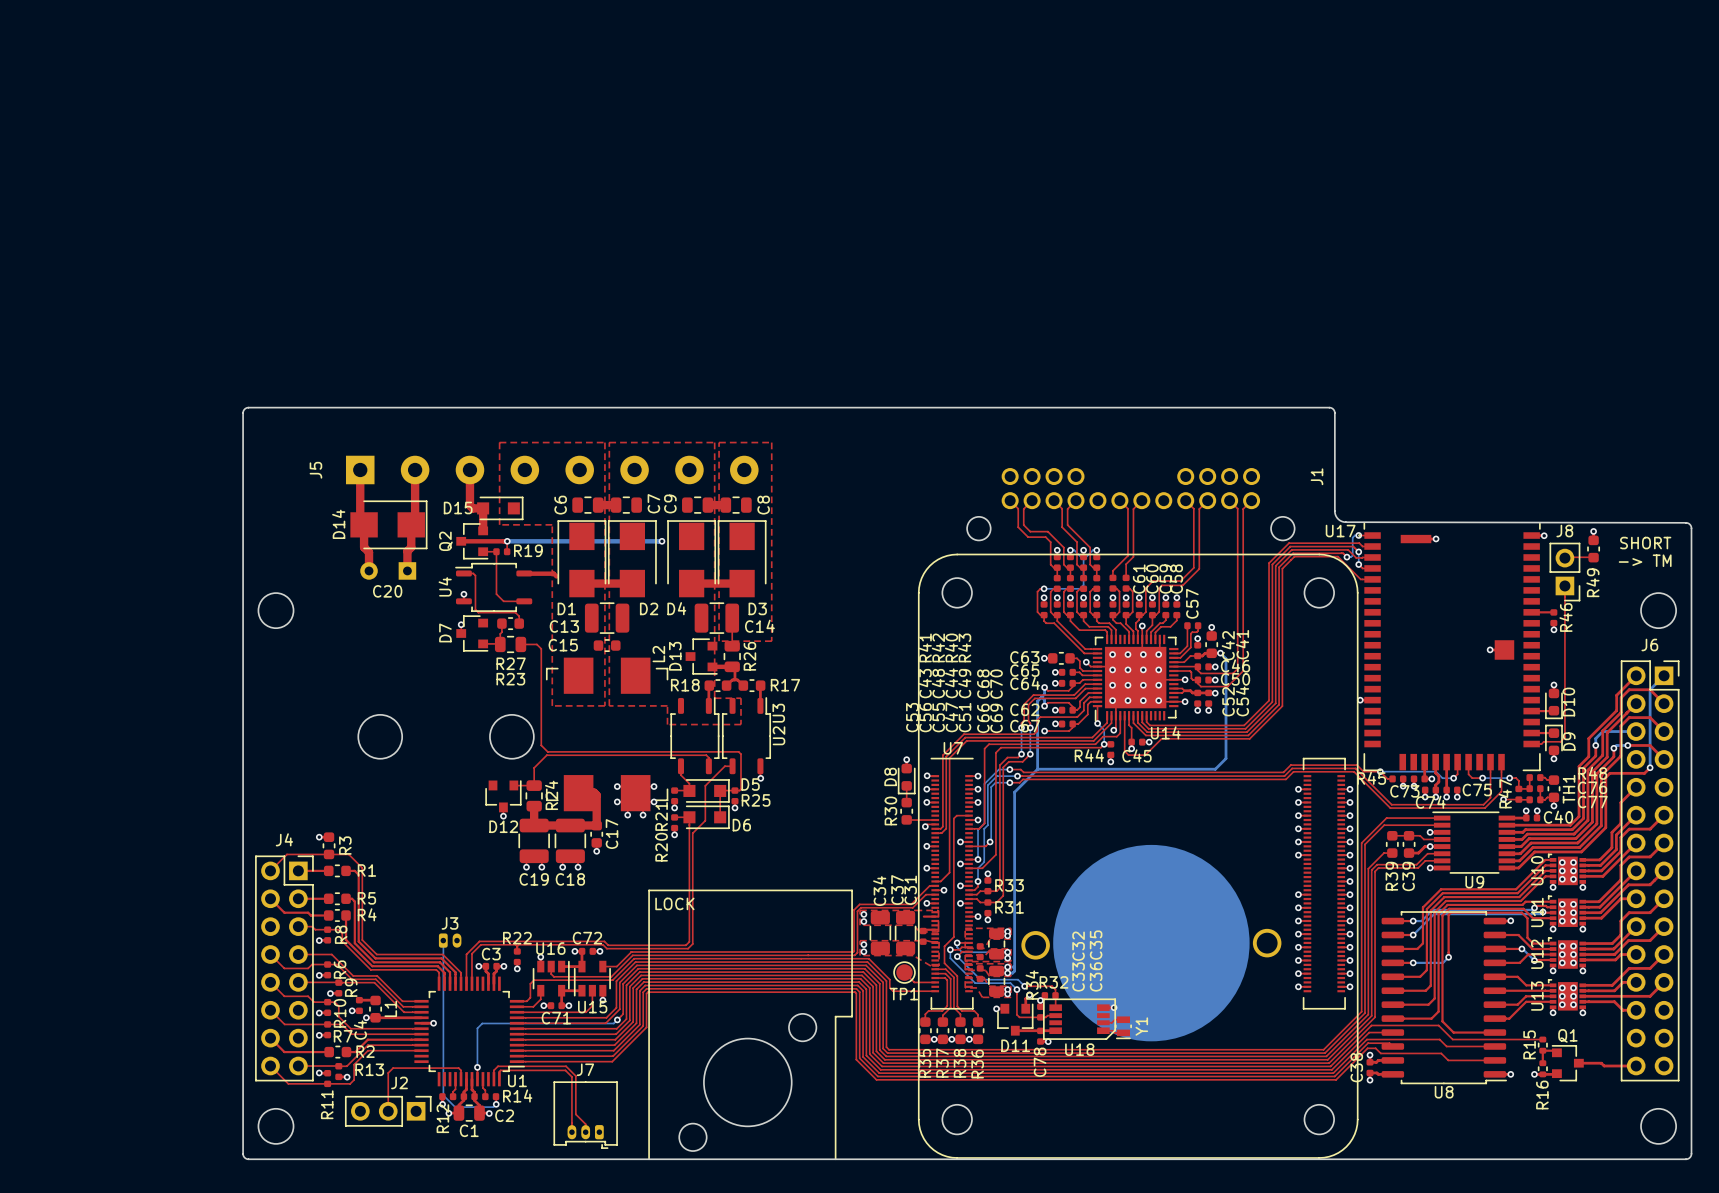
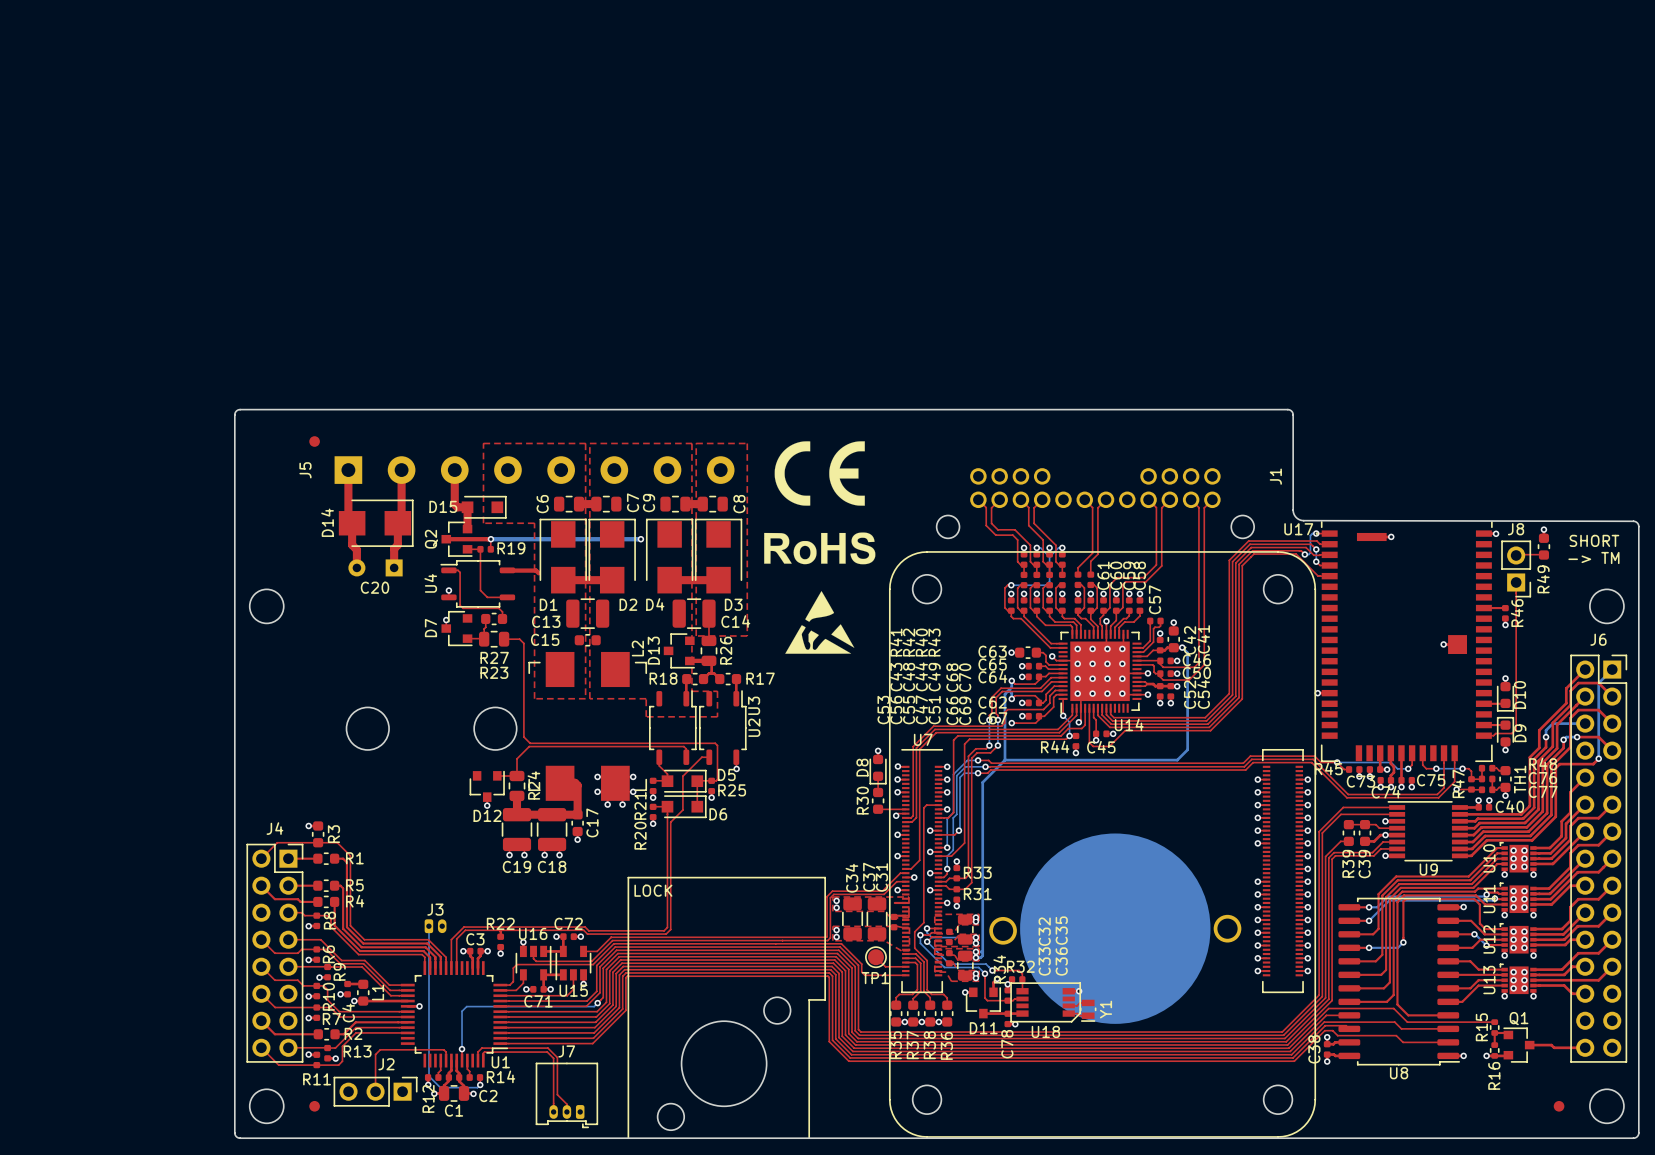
part: none -> (314, 441)
drawing: none -> [774, 441, 865, 506]
drawing: none -> [764, 532, 876, 565]
drawing: none -> [785, 591, 855, 654]
R11 name rotation: 0° (327, 1104) -> 90° clockwise (317, 1079)
part: none -> (314, 1106)
part: none -> (1559, 1106)

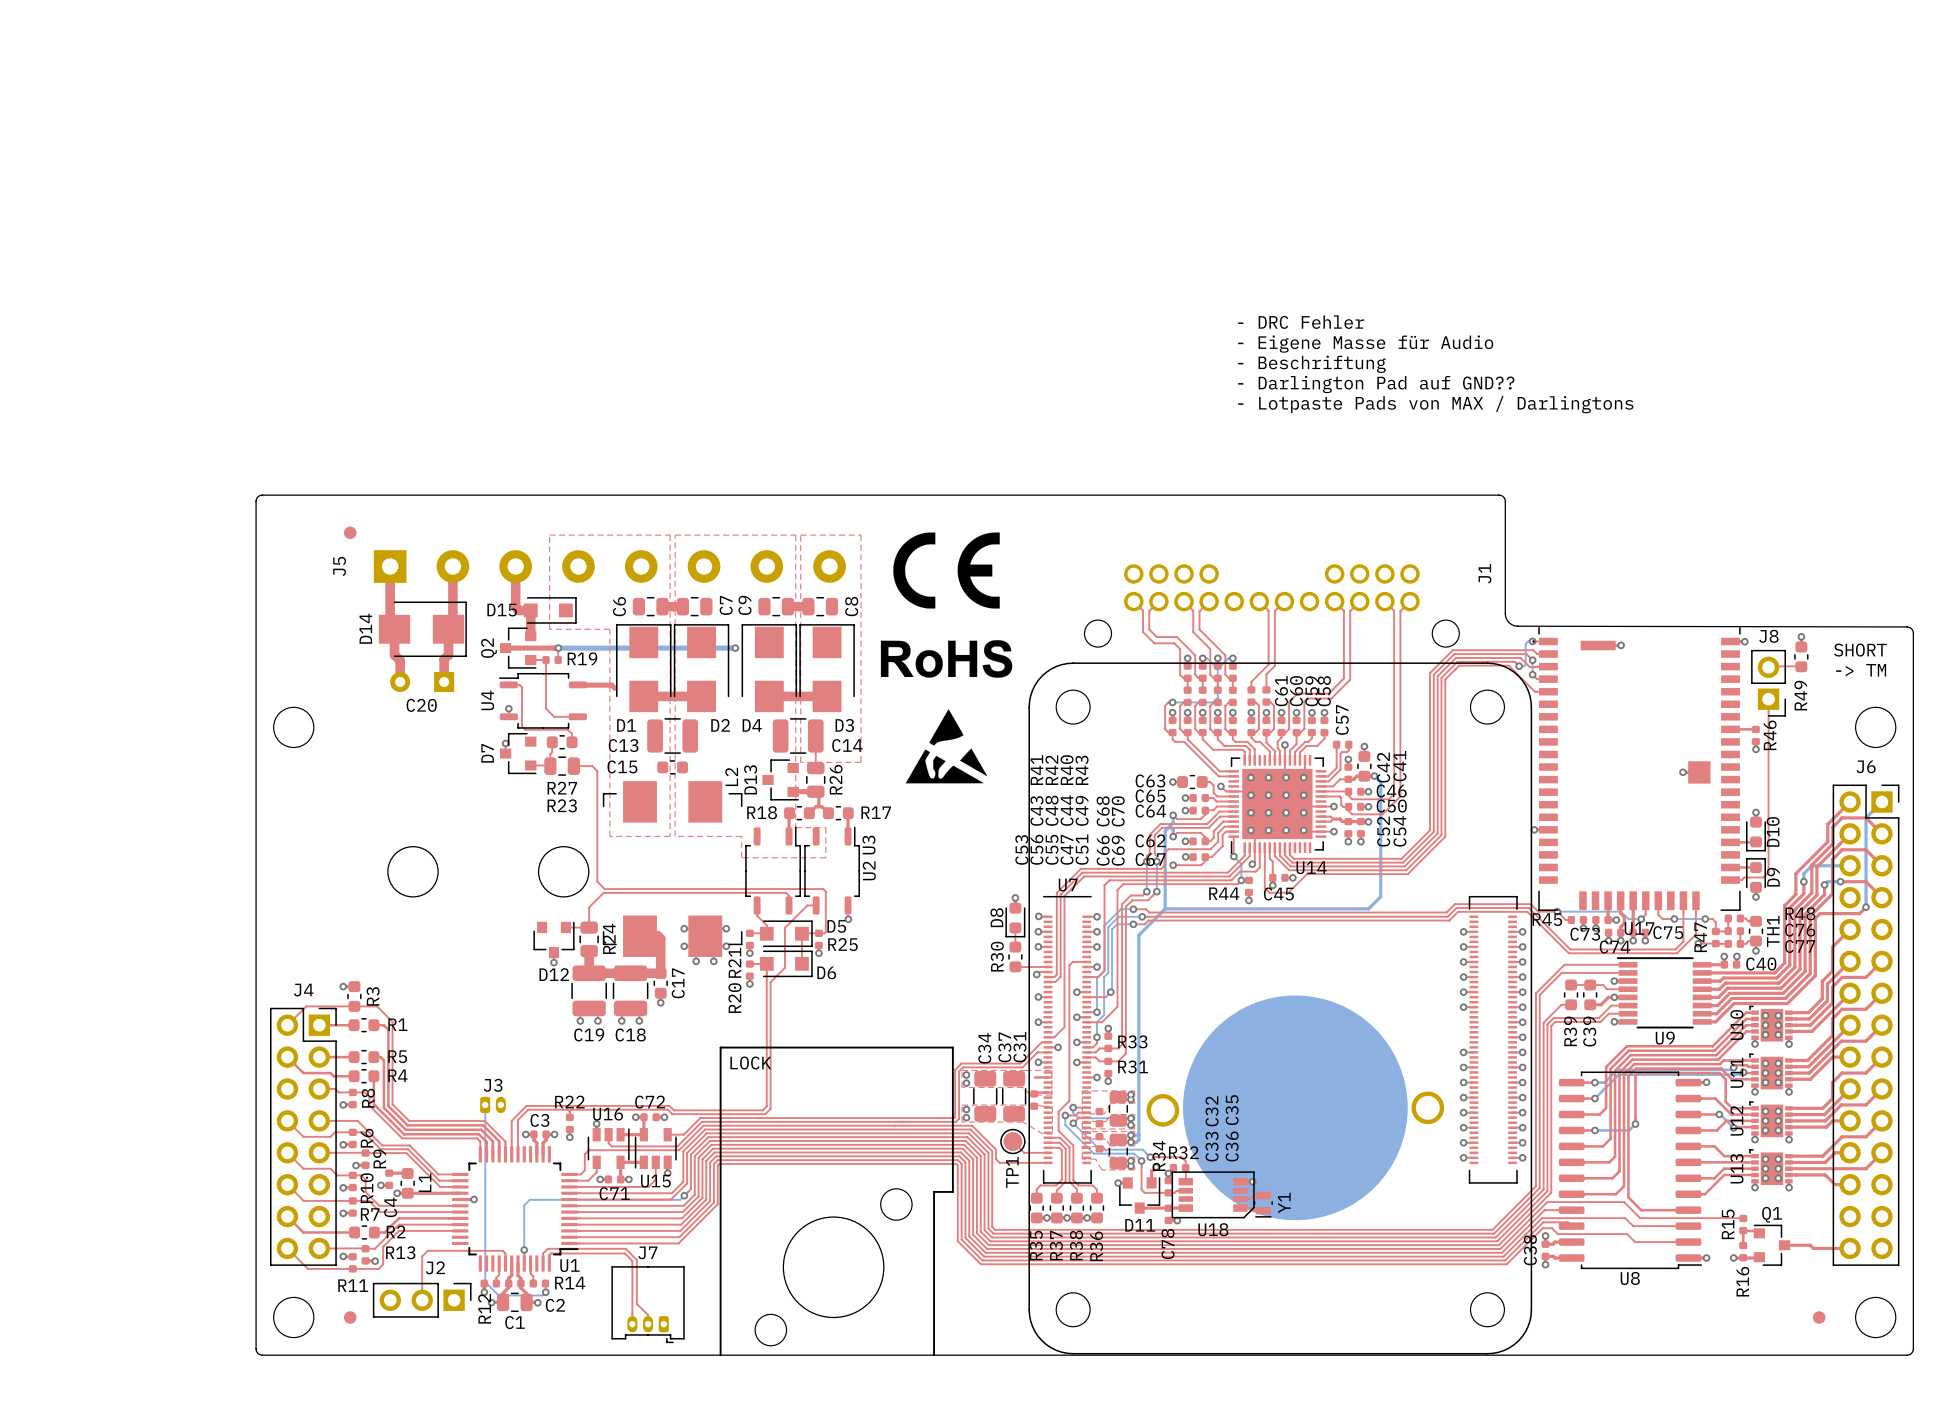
text: none -> - DRC Fehler (1301, 322)
text: none -> - Eigene Masse für Audio (1365, 344)
text: none -> - Beschriftung (1311, 364)
text: none -> - Darlington Pad auf GND?? (1376, 384)
text: none -> - Lotpaste Pads von MAX / Darlingtons (1435, 404)
U17 name position: U17 (1298, 529) -> U17 (1639, 928)
TP1 name rotation: 0° (875, 978) -> 90° counterclockwise (1012, 1172)
R15 footprint: [1490, 1019, 1500, 1036] -> [1739, 1214, 1748, 1235]
R16 footprint: [1490, 1042, 1500, 1059] -> [1739, 1241, 1748, 1262]

